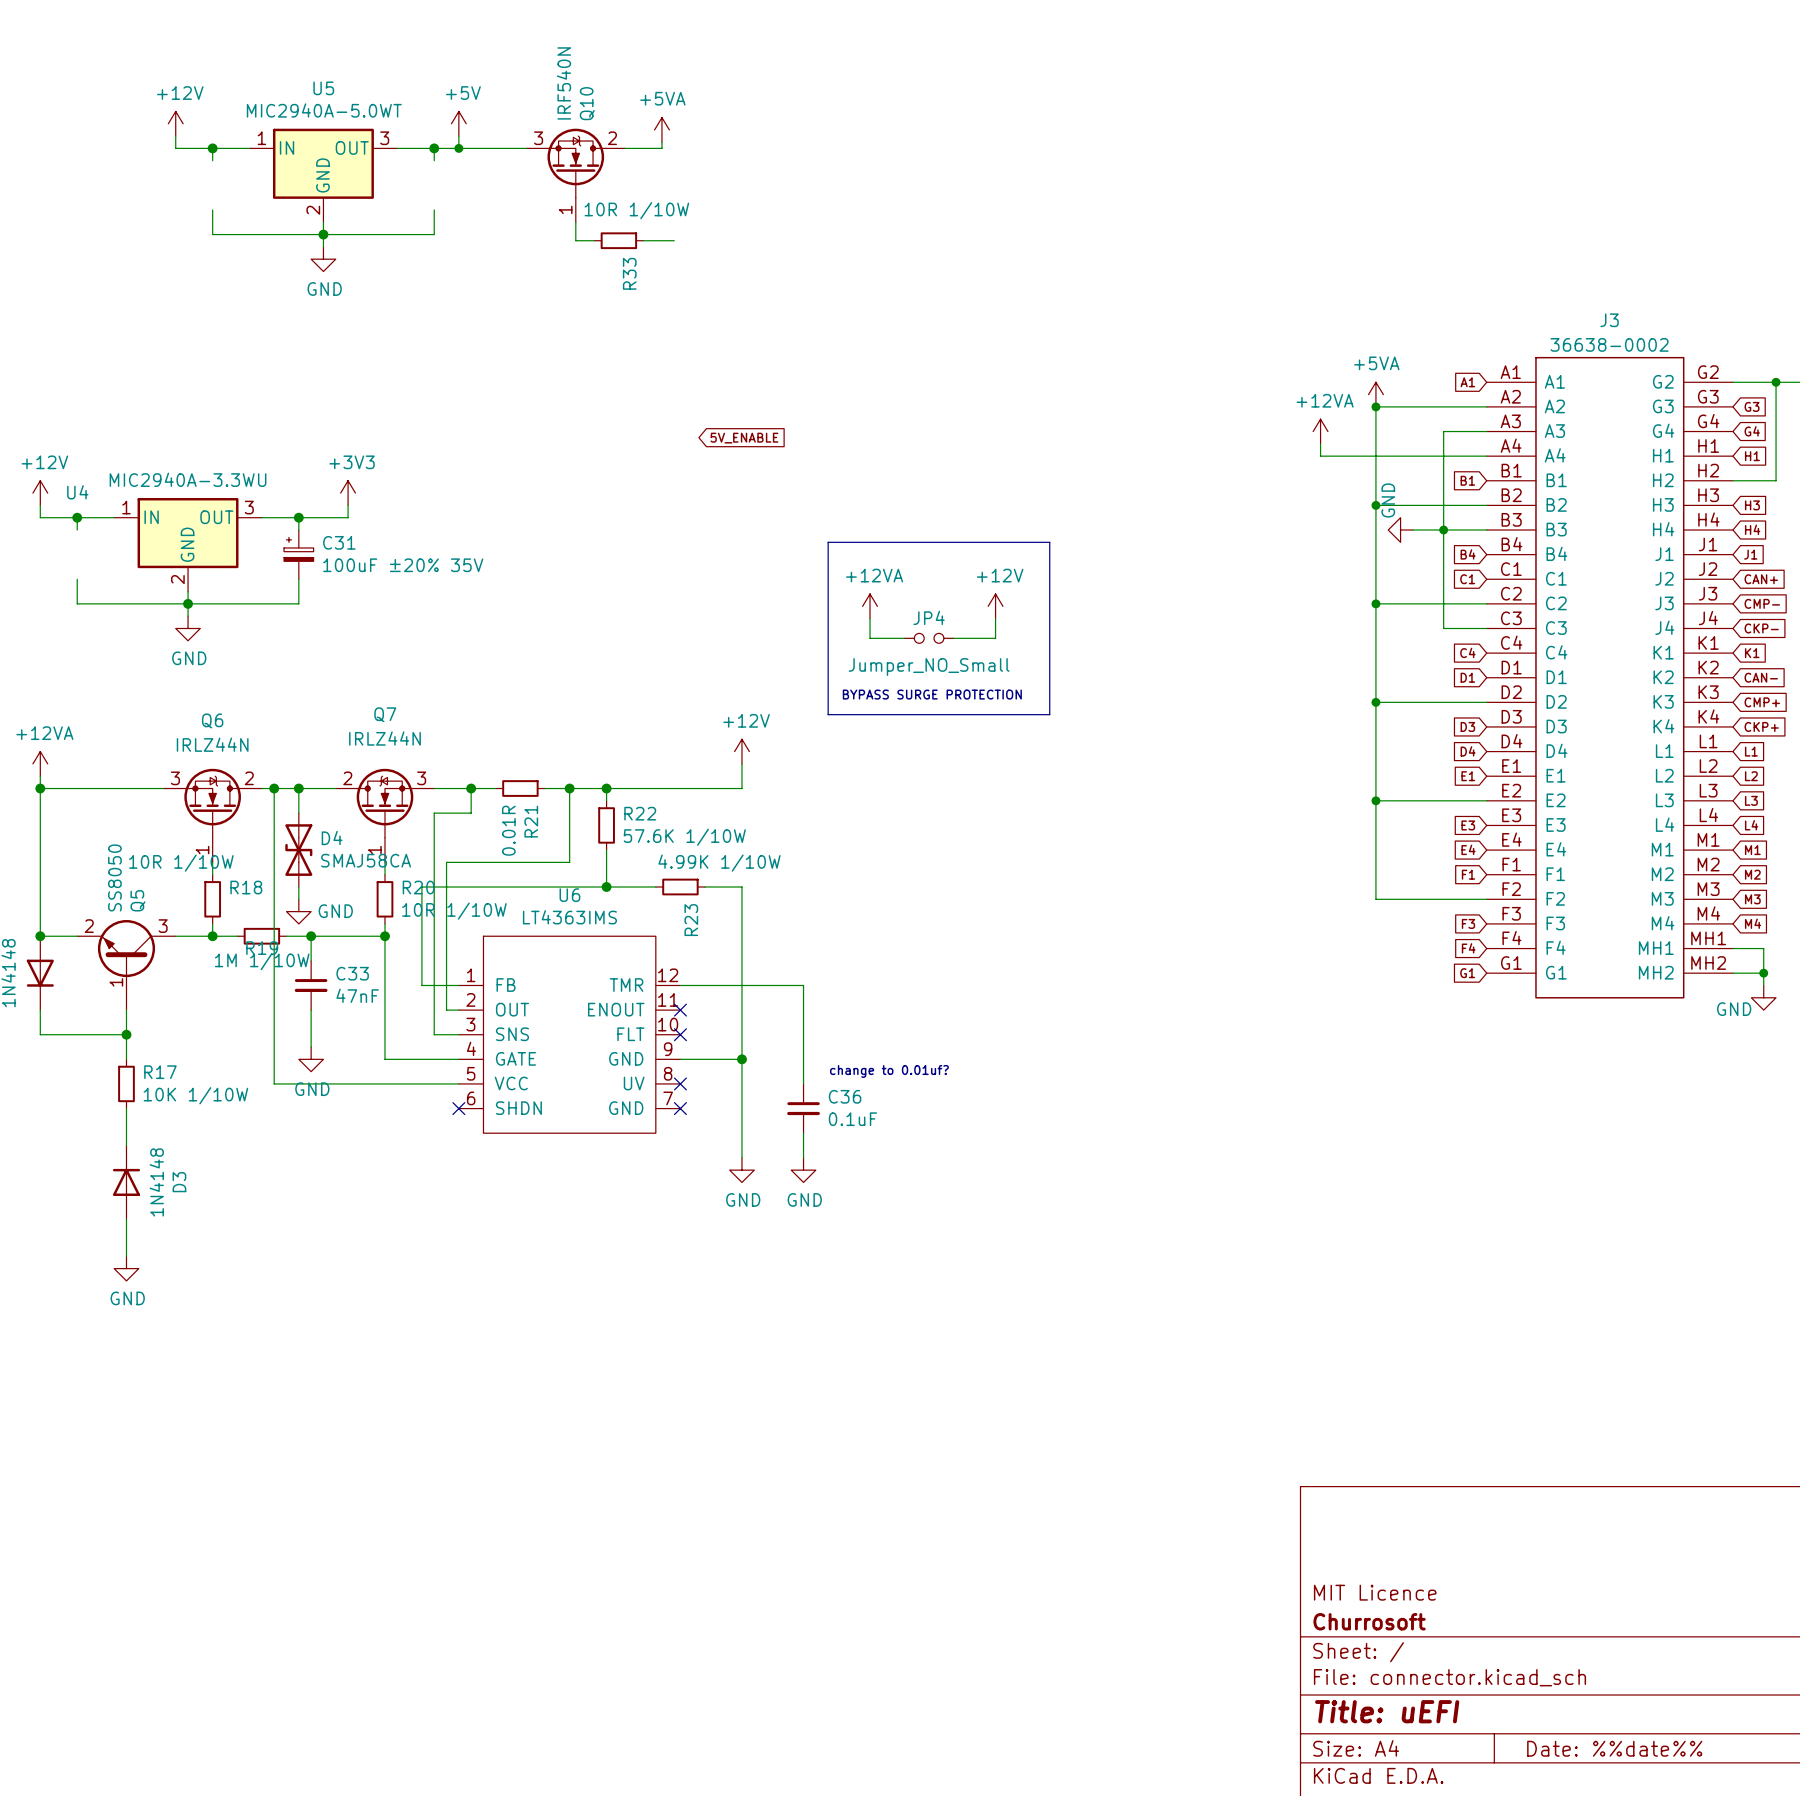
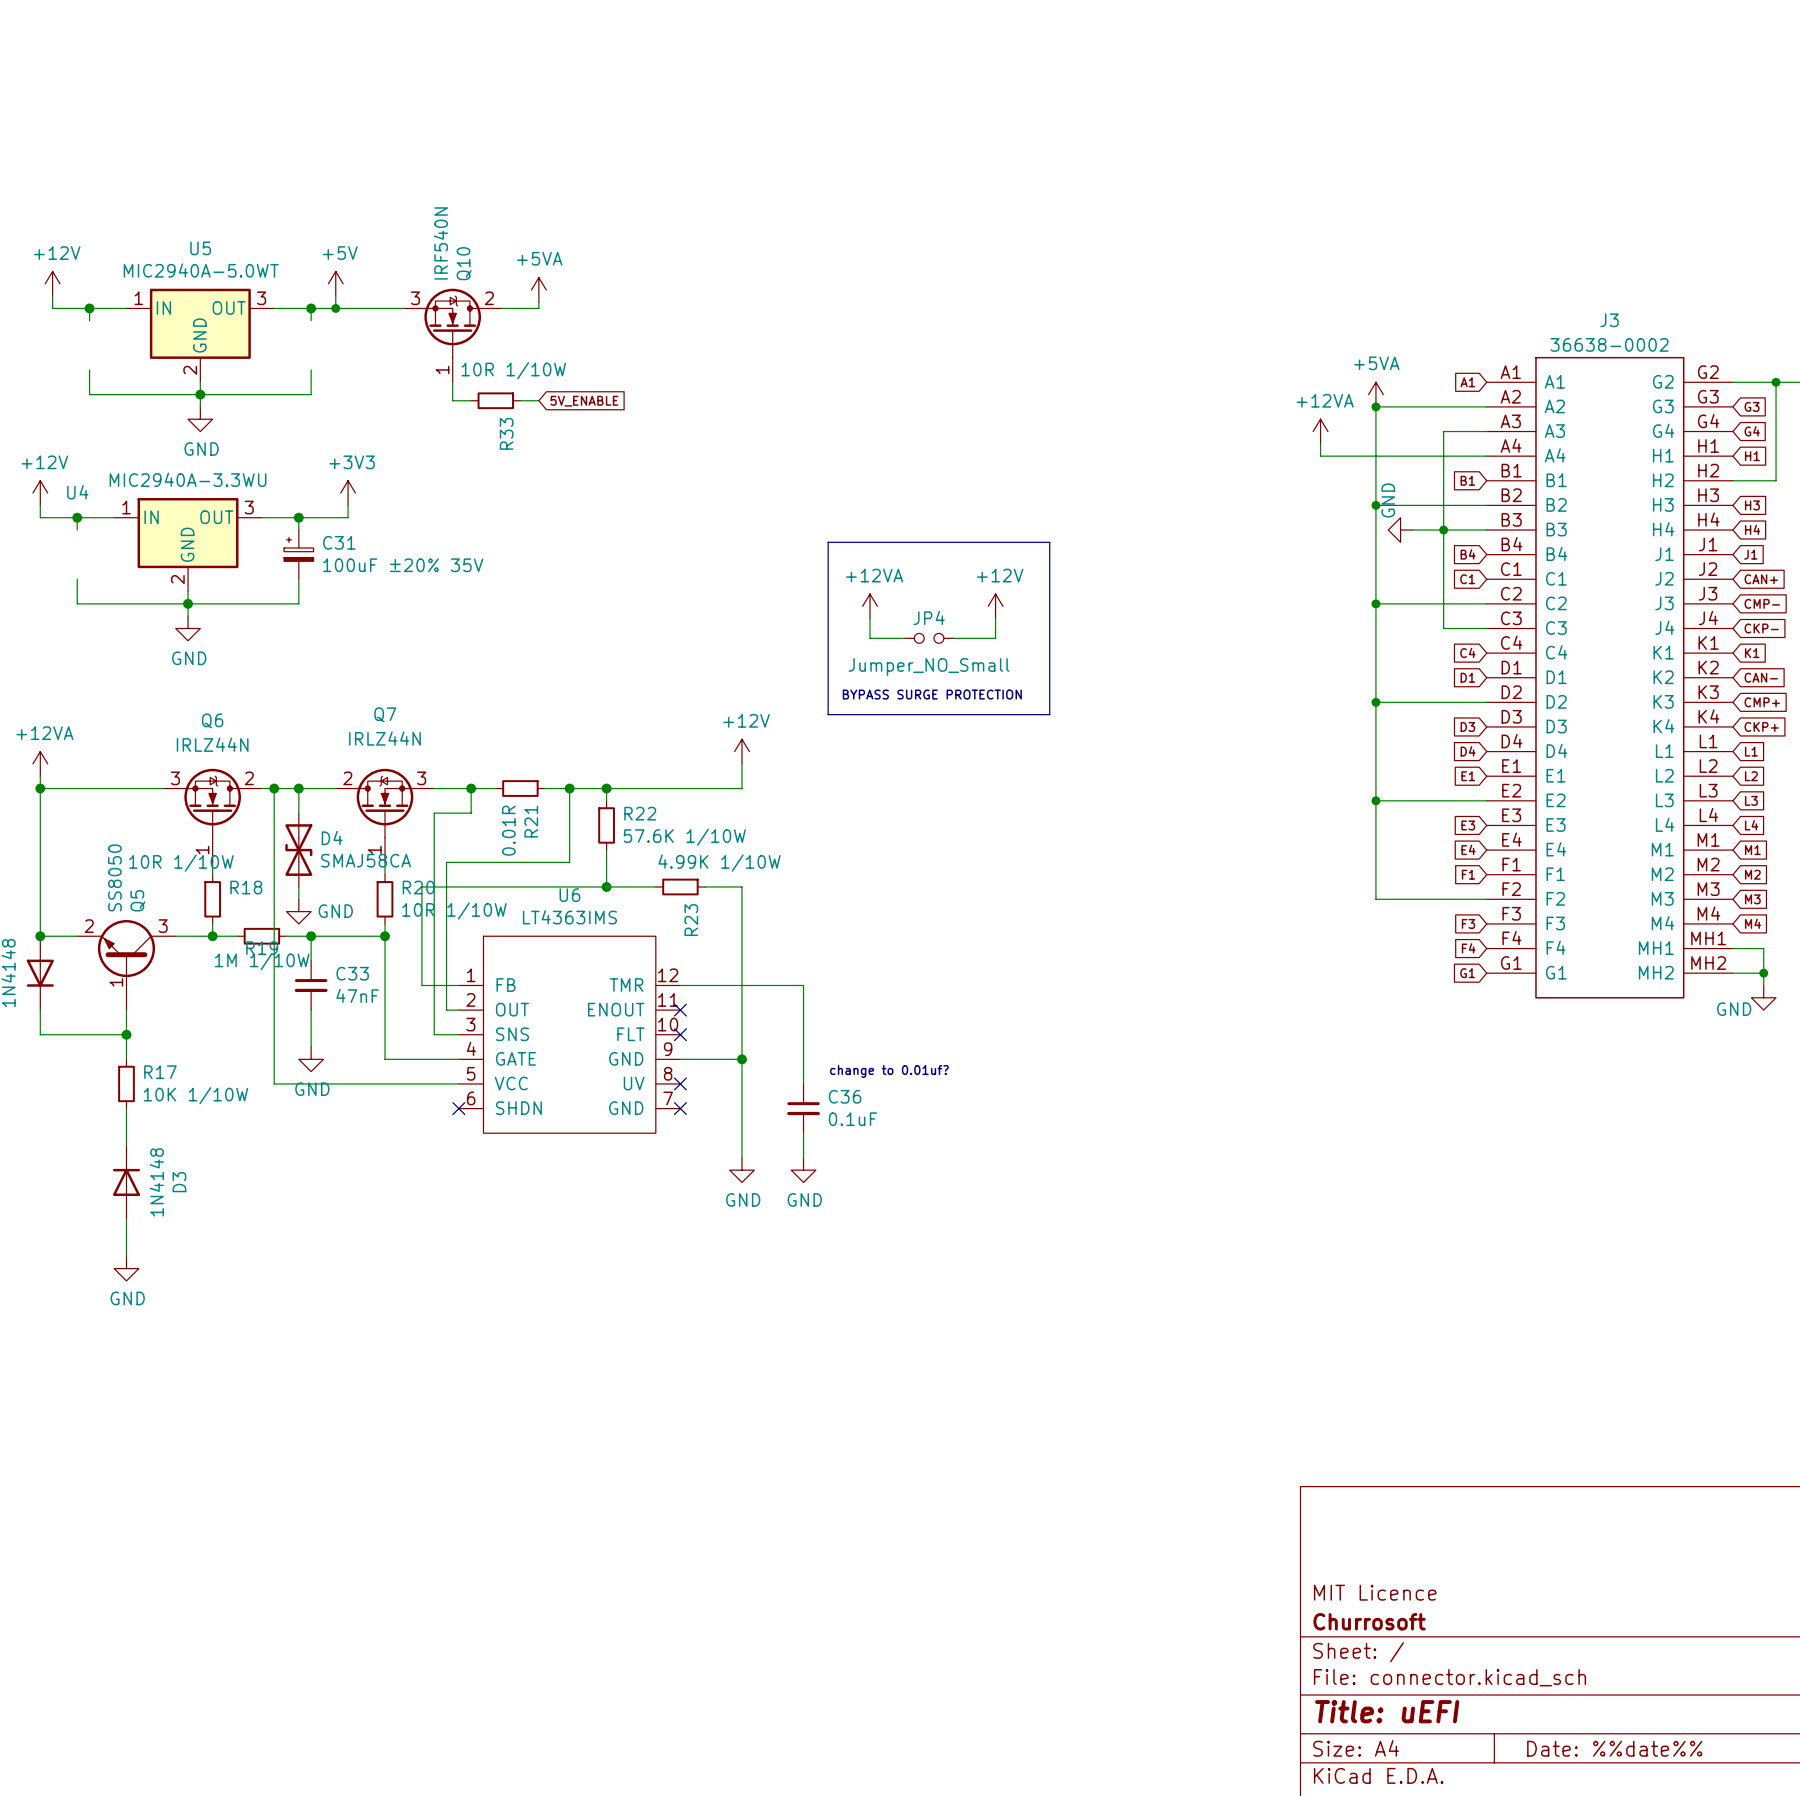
power symbol position: +12V (175, 123) -> +12V (52, 283)
power symbol position: +5V (458, 123) -> +5V (335, 283)
power symbol position: +5VA (661, 129) -> +5VA (538, 289)
wire: (175, 136) (175, 148) (249, 148) -> (52, 296) (52, 308) (126, 308)
wire: (458, 136) (458, 148) -> (335, 296) (335, 308)
wire: (661, 142) (661, 148) (625, 148) -> (538, 302) (538, 308) (501, 308)
wire: (212, 148) (212, 160) -> (89, 308) (89, 320)
junction: (212, 148) -> none
wire: (397, 148) (526, 148) -> (274, 308) (403, 308)
wire: (434, 148) (434, 160) -> (311, 308) (311, 320)
junction: (434, 148) -> none
junction: (458, 148) -> none
U5 position: (323, 175) -> (200, 335)
Q10 position: (575, 175) -> (452, 335)
wire: (212, 209) (212, 234) (434, 234) (434, 209) -> (89, 369) (89, 394) (311, 394) (311, 369)
wire: (323, 222) (323, 246) -> (200, 382) (200, 406)
wire: (575, 222) (575, 240) (594, 240) -> (452, 382) (452, 400) (471, 400)
junction: (323, 234) -> none
R33 position: (618, 240) -> (495, 400)
wire: (643, 240) (674, 240) -> none
power symbol position: GND (323, 259) -> GND (200, 419)
junction: none -> (89, 308)
junction: none -> (311, 308)
junction: none -> (335, 308)
junction: none -> (200, 394)
wire: none -> (520, 400) (538, 400)
global label position: 5V_ENABLE (744, 438) -> 5V_ENABLE (584, 401)

